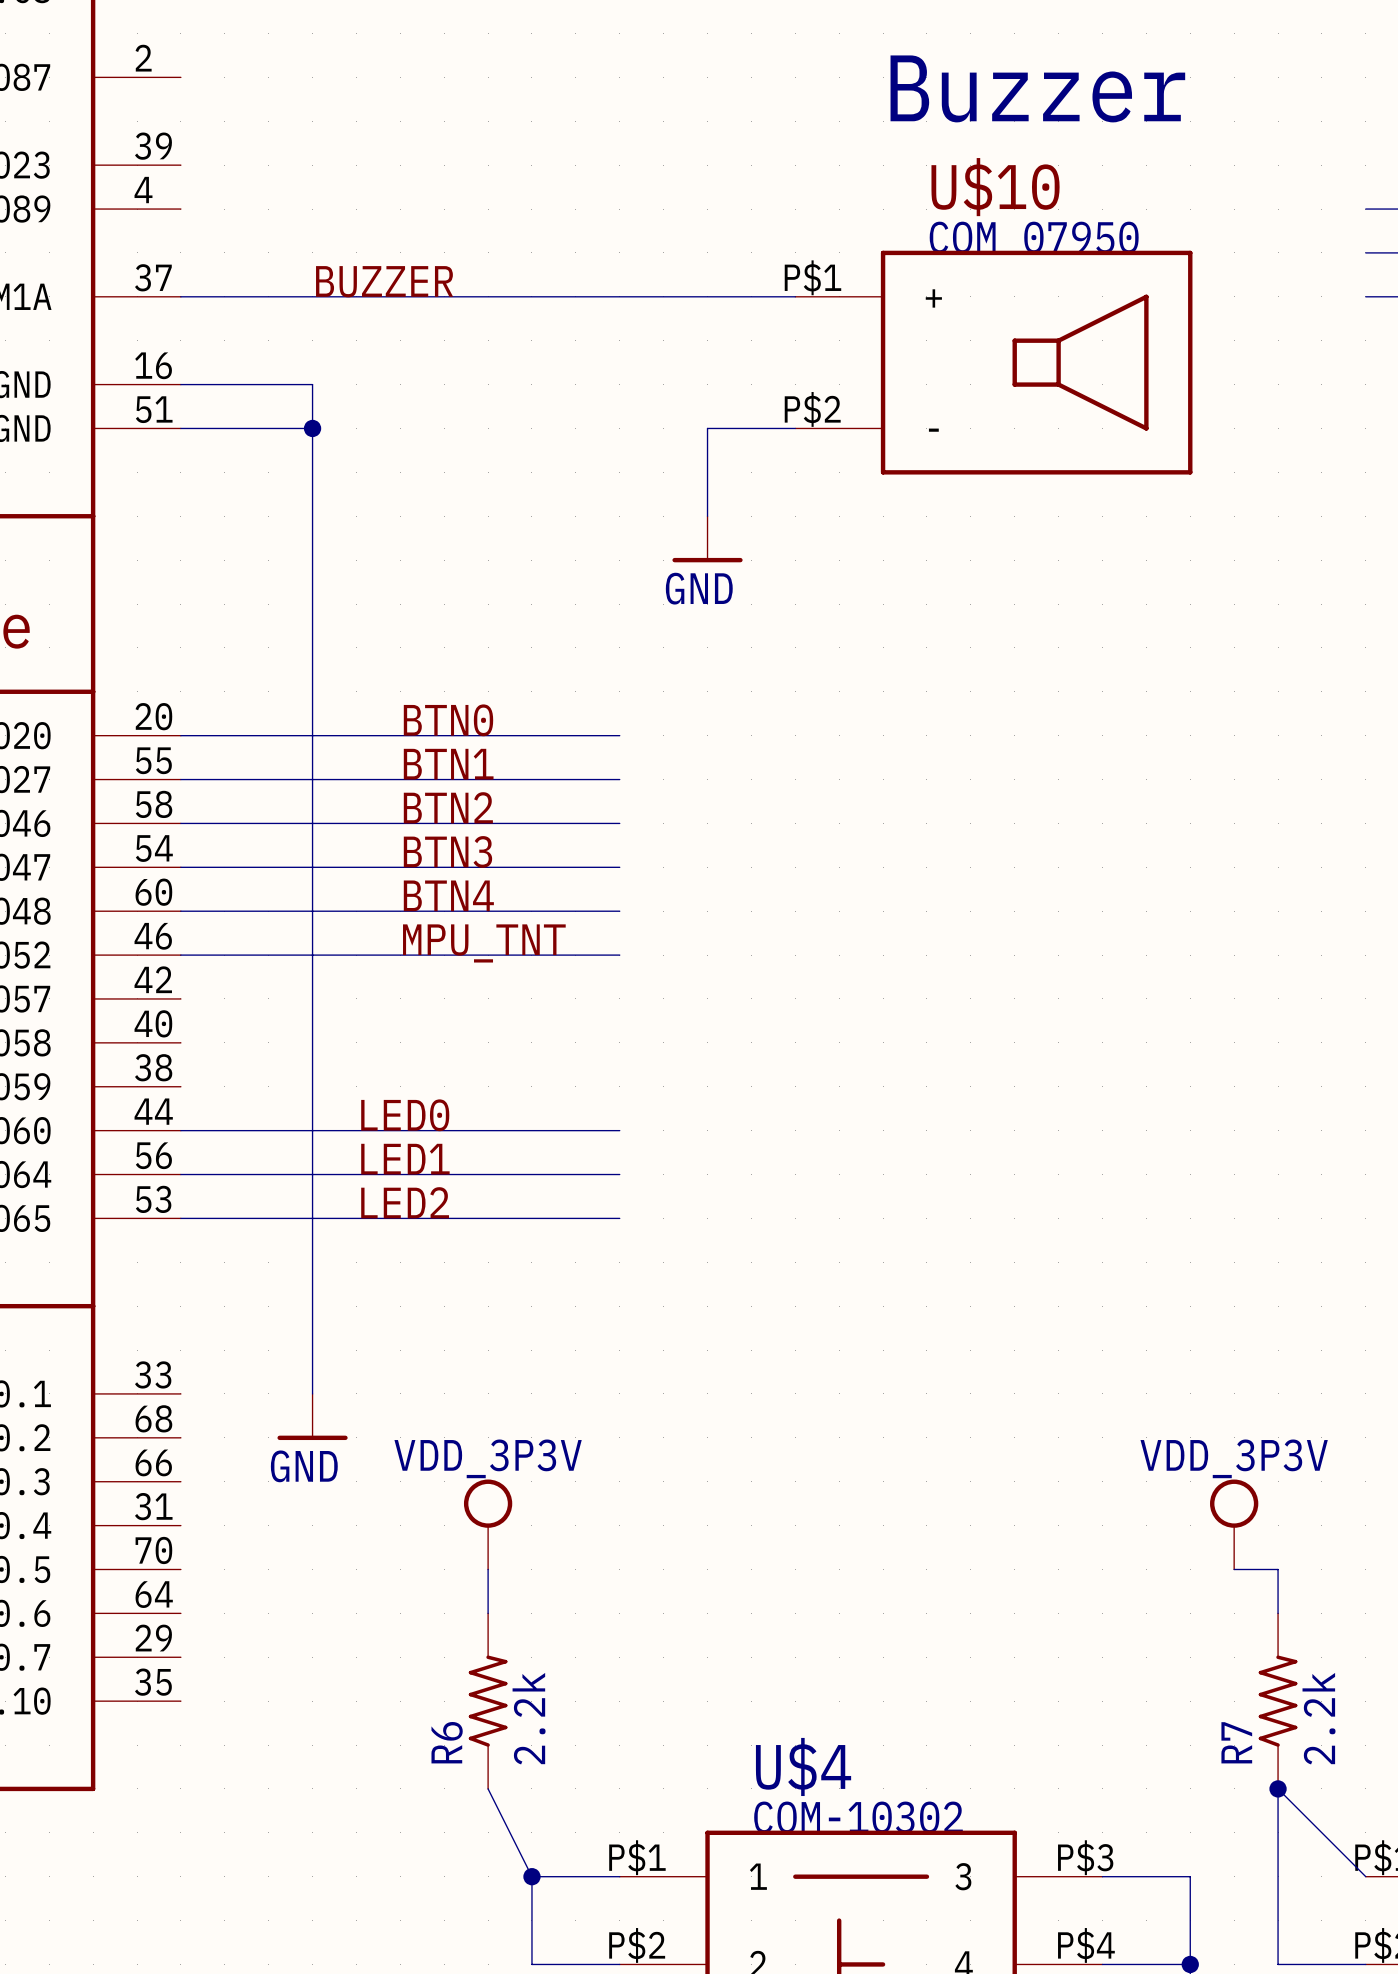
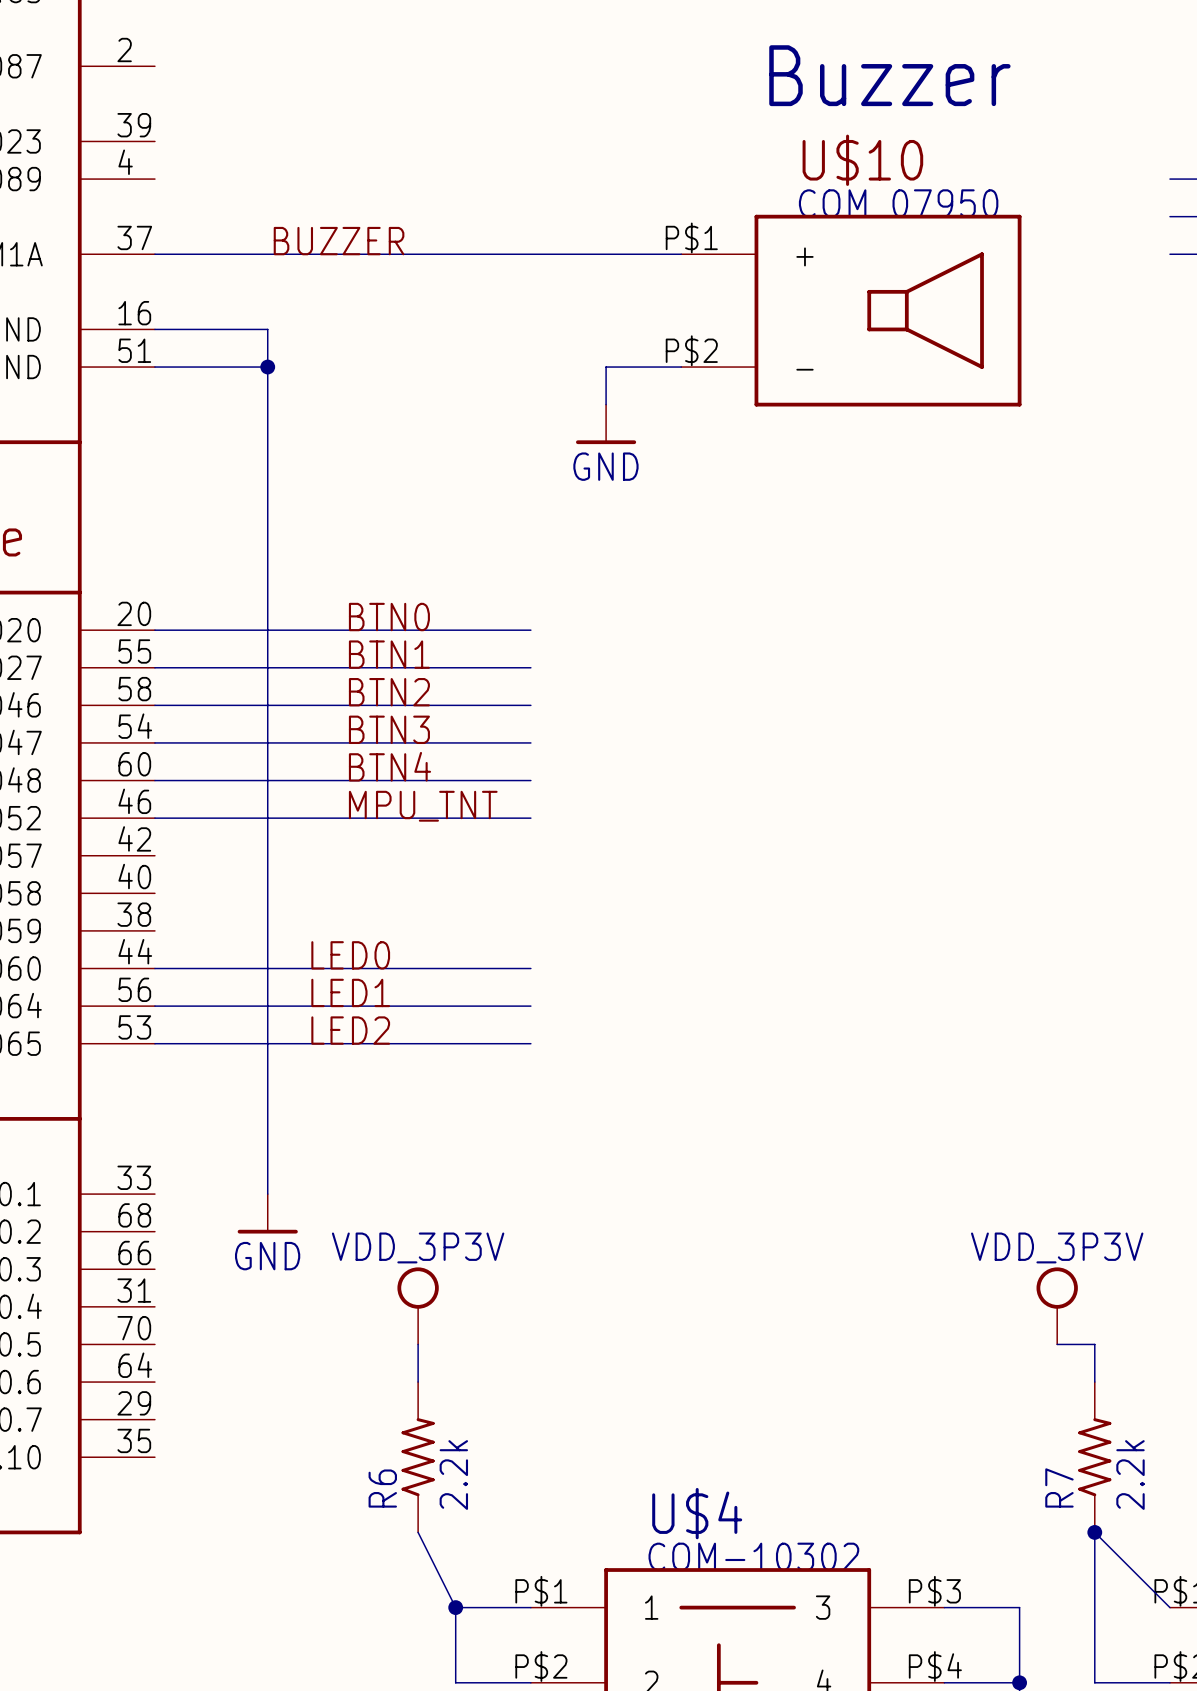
power symbol position: GND (707, 539) -> GND (606, 424)

